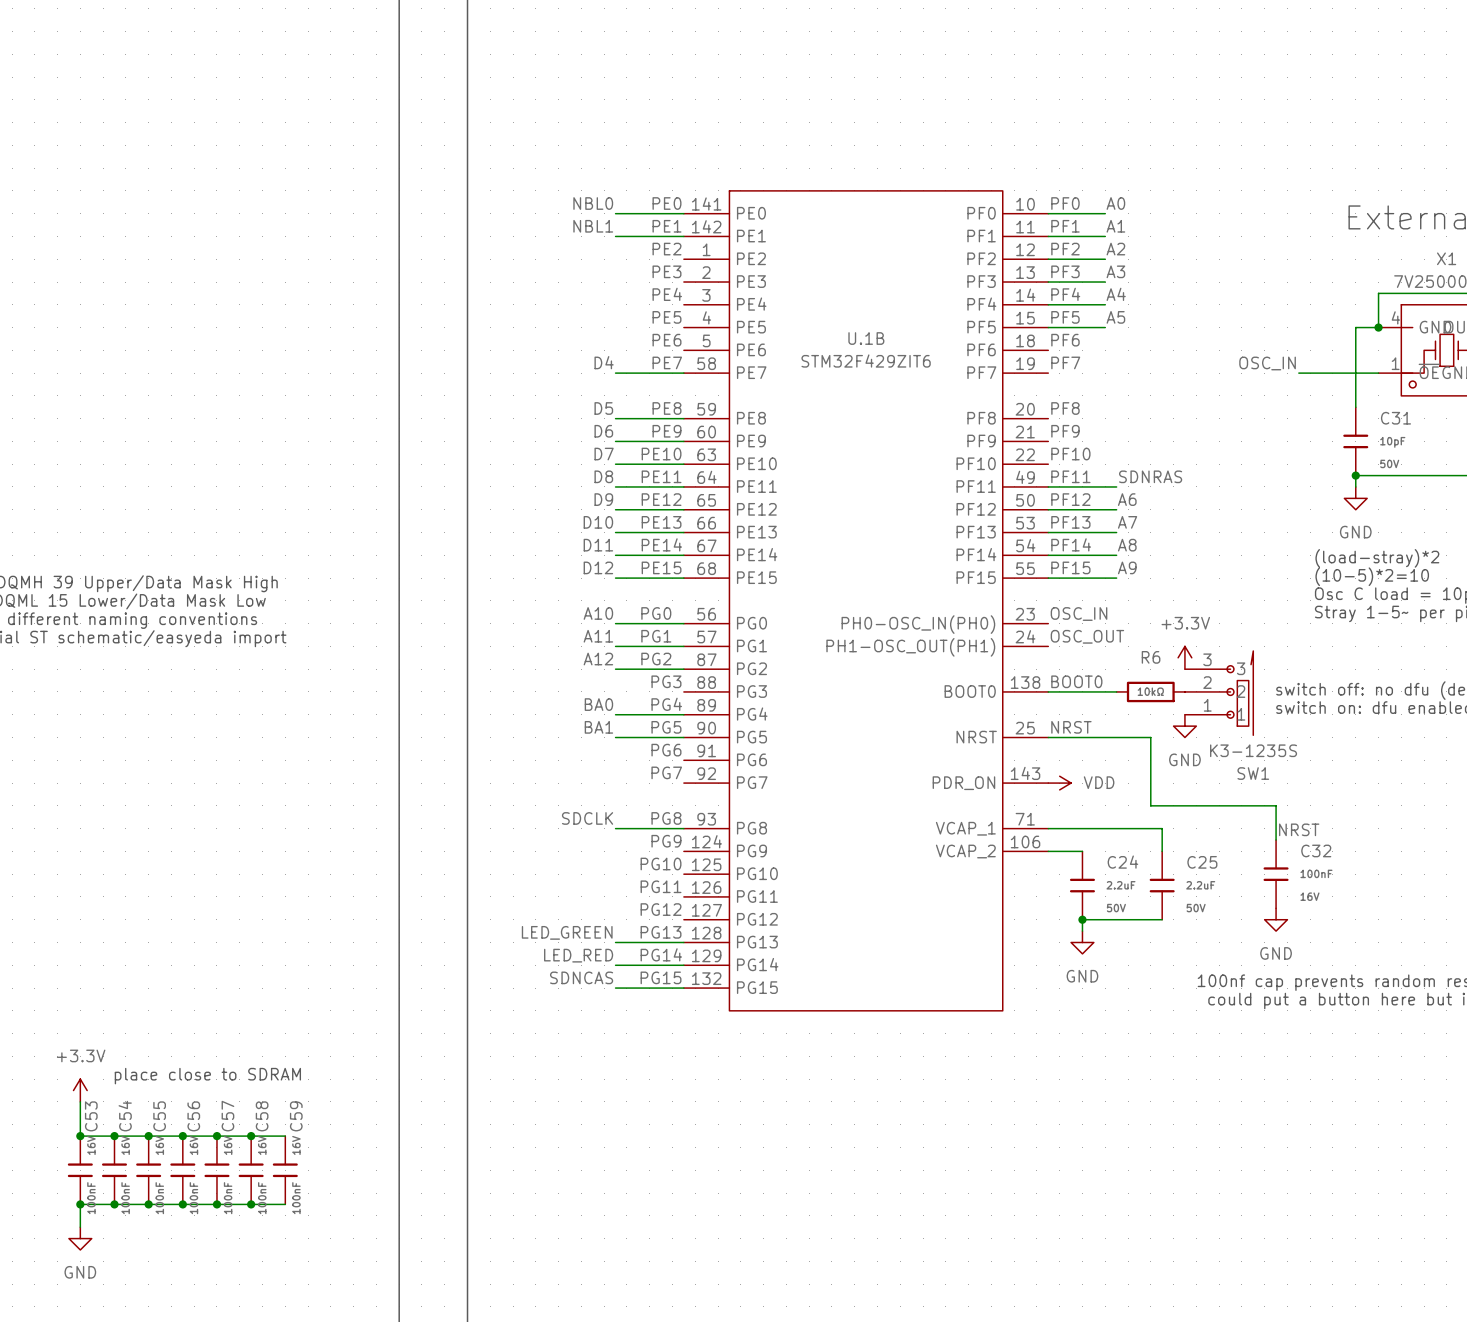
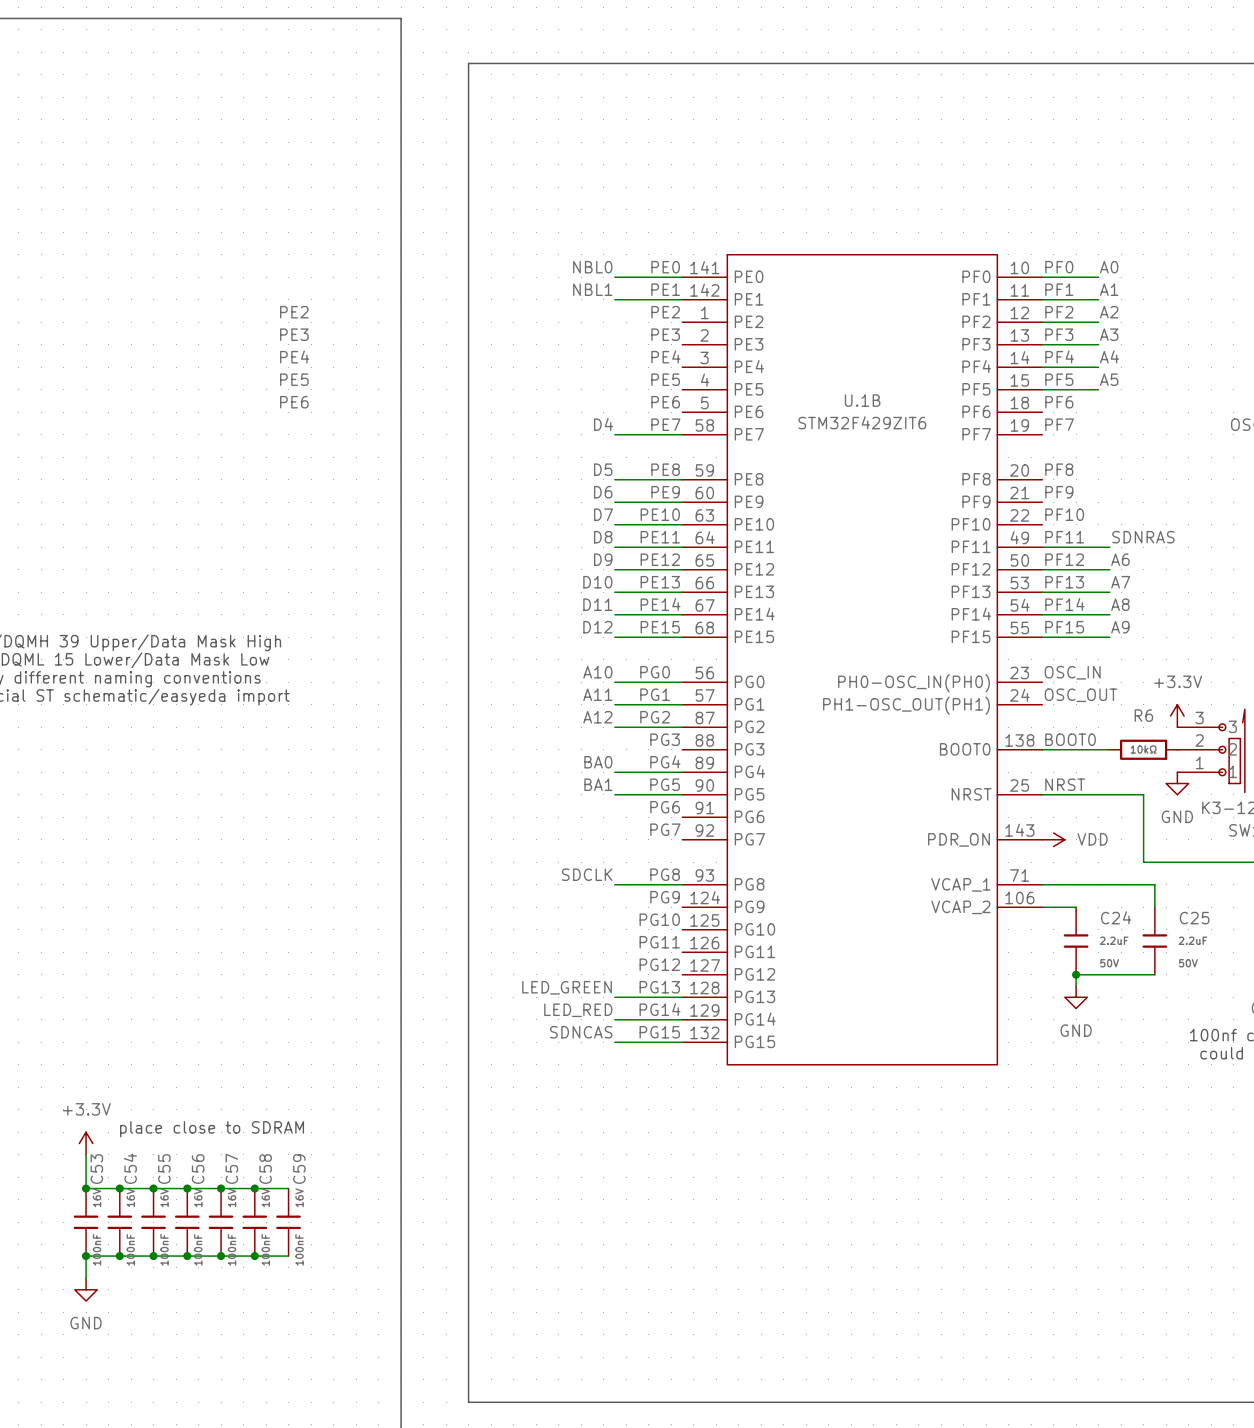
label: none -> PE2 (294, 312)
label: none -> PE3 (294, 334)
label: none -> PE4 (294, 356)
label: none -> PE5 (294, 379)
label: none -> PE6 (294, 402)

